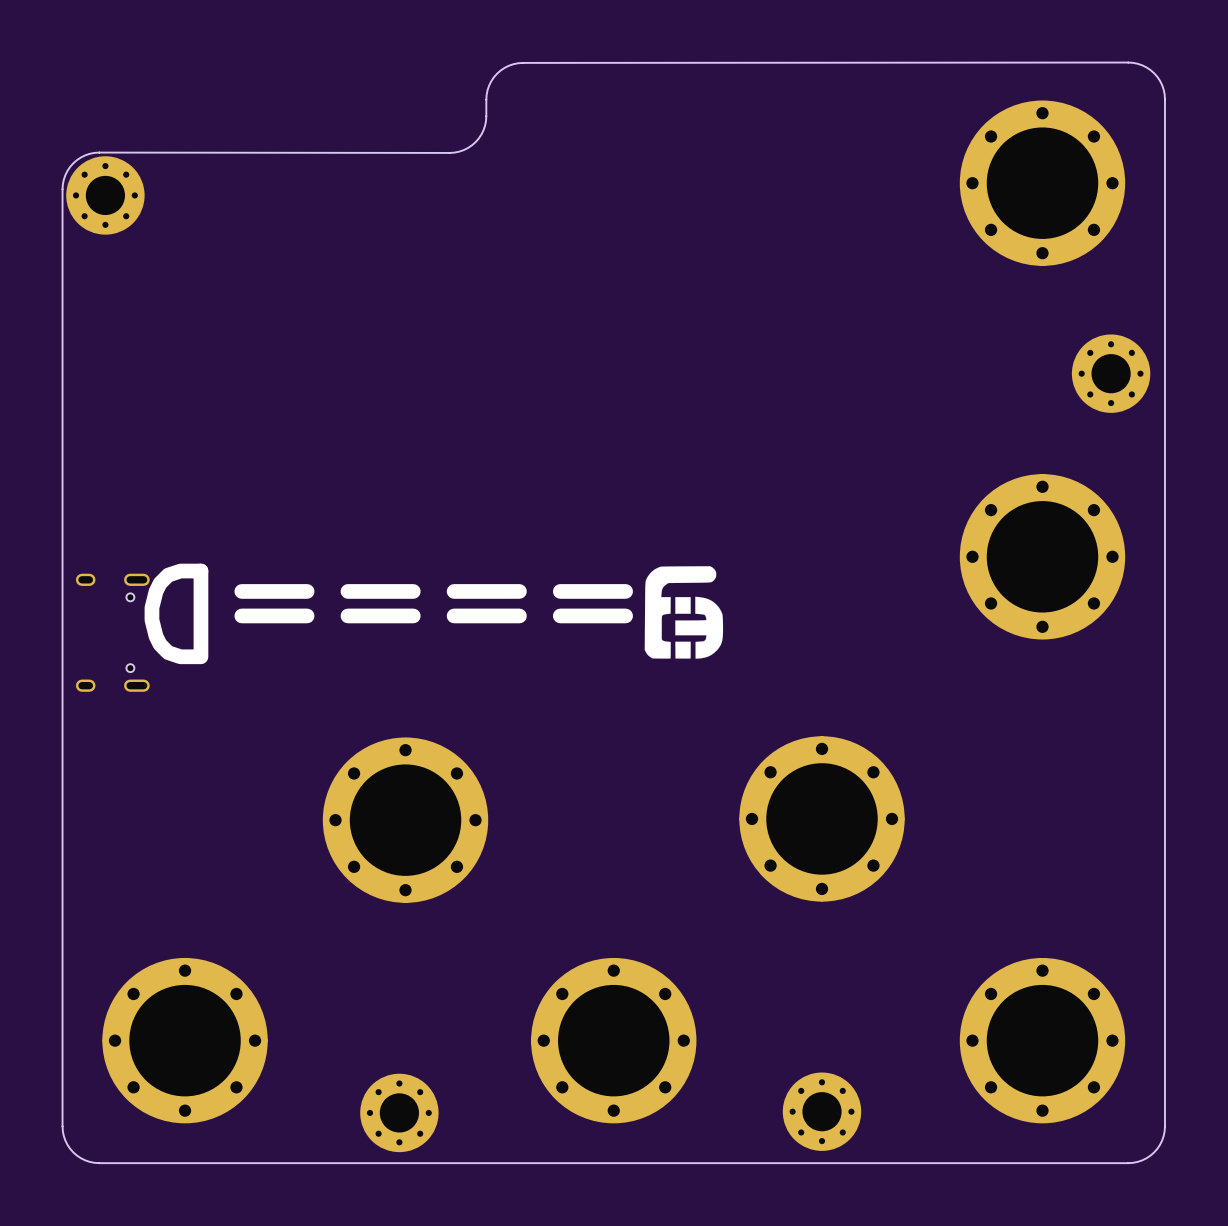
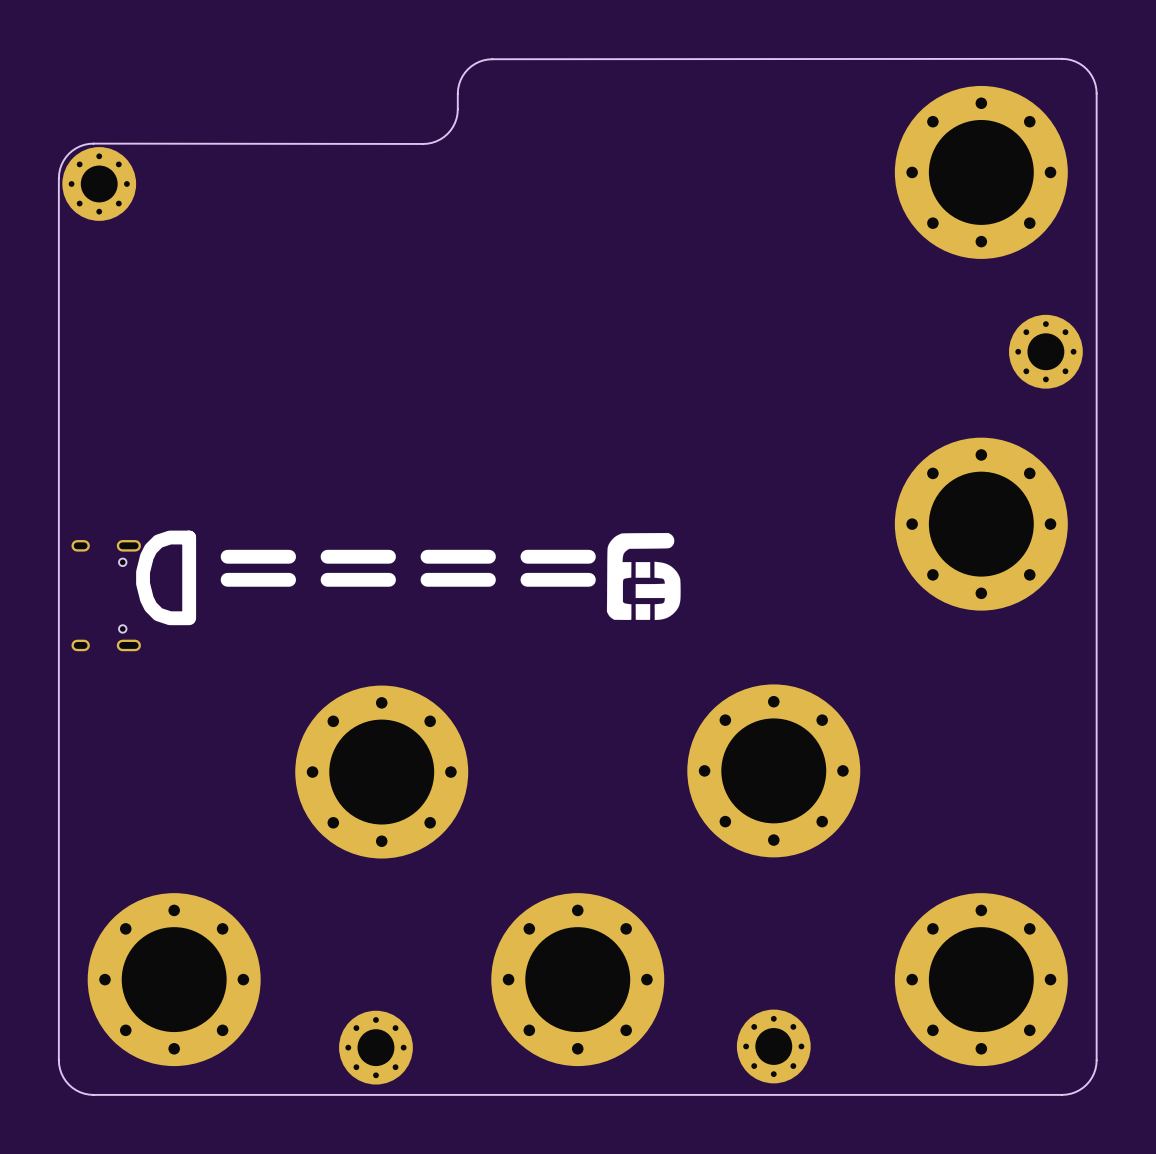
part footprint: [959, 100, 1126, 266] -> [894, 85, 1068, 259]
part footprint: [959, 474, 1126, 640] -> [894, 437, 1068, 611]
part footprint: [739, 736, 905, 902] -> [687, 684, 861, 858]
part footprint: [322, 737, 489, 903] -> [295, 685, 469, 859]
part footprint: [102, 957, 268, 1124] -> [87, 893, 261, 1067]
part footprint: [531, 957, 697, 1124] -> [491, 893, 665, 1067]
part footprint: [959, 957, 1126, 1124] -> [894, 893, 1068, 1067]

